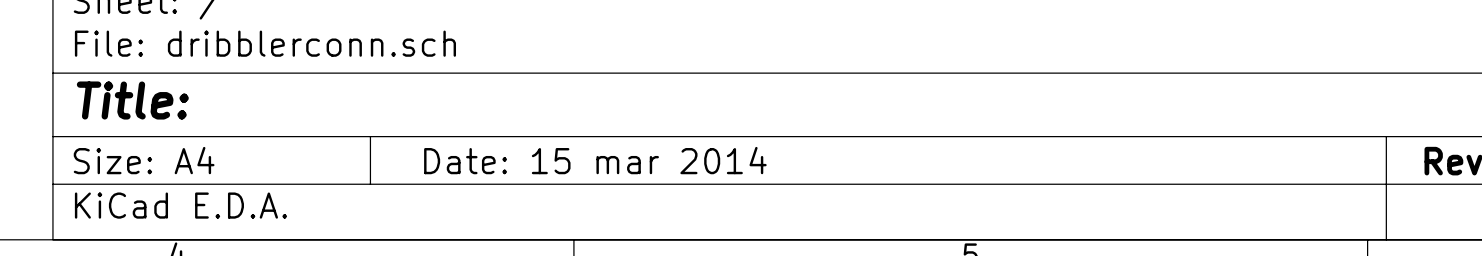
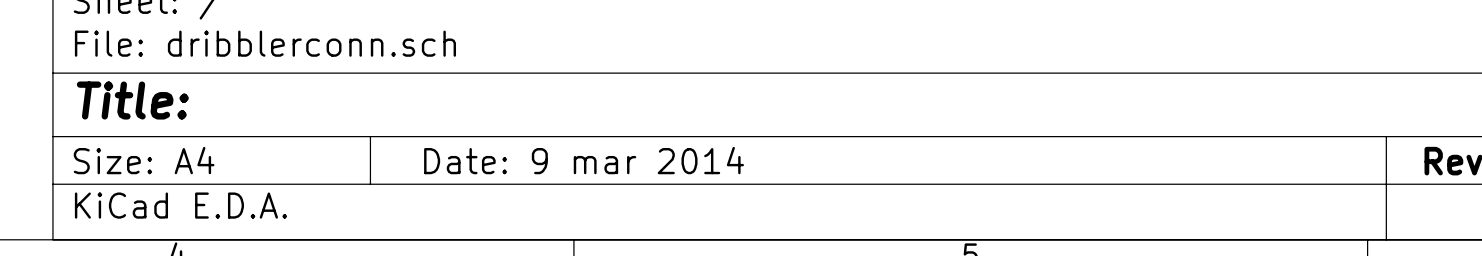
title block: Date: 15 mar 2014 (595, 160) -> Date: 9 mar 2014 (584, 160)

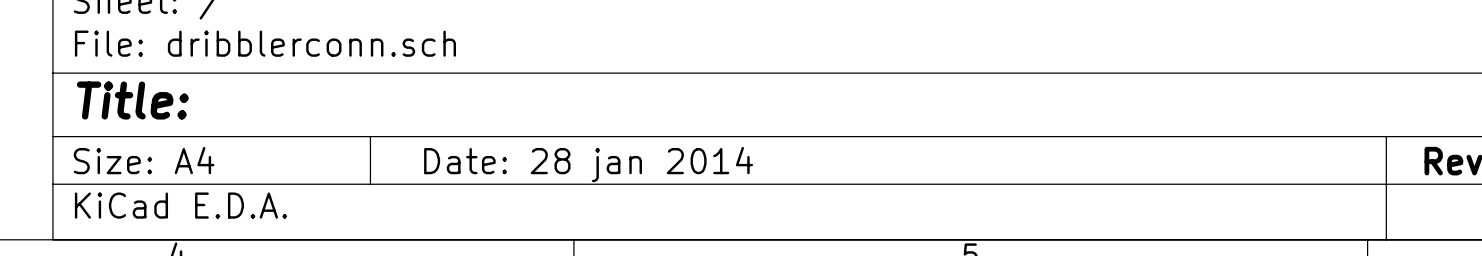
title block: Date: 9 mar 2014 (584, 160) -> Date: 28 jan 2014 (588, 164)

